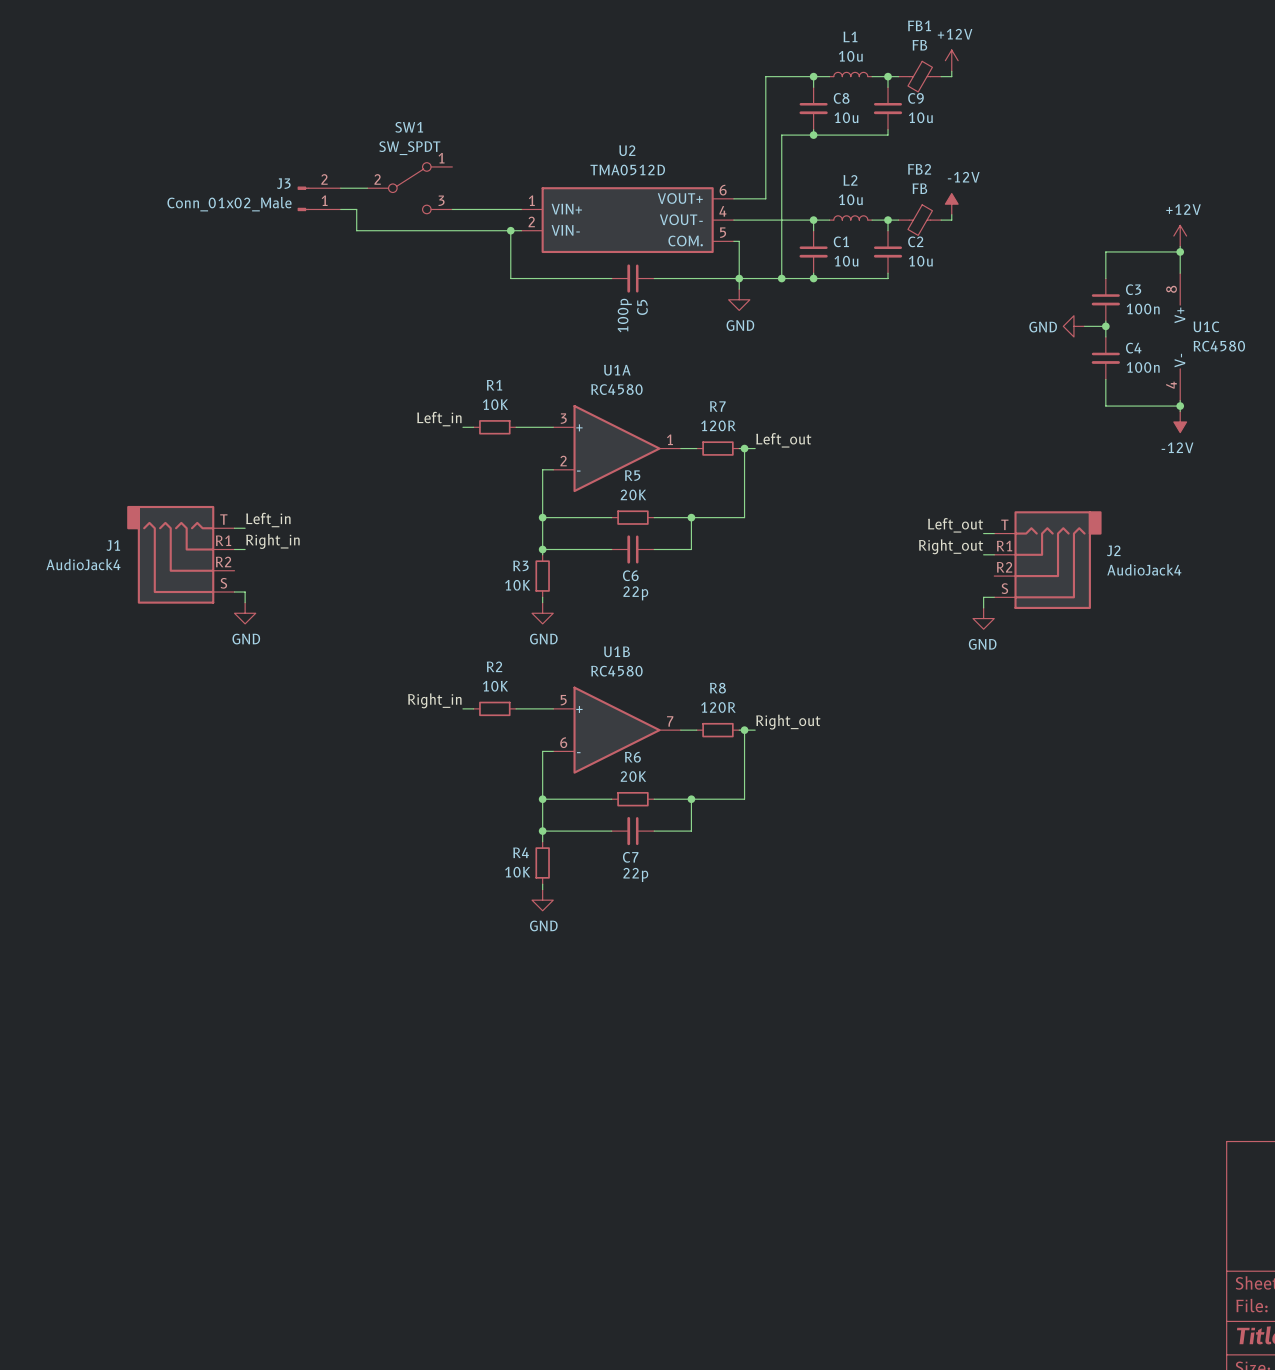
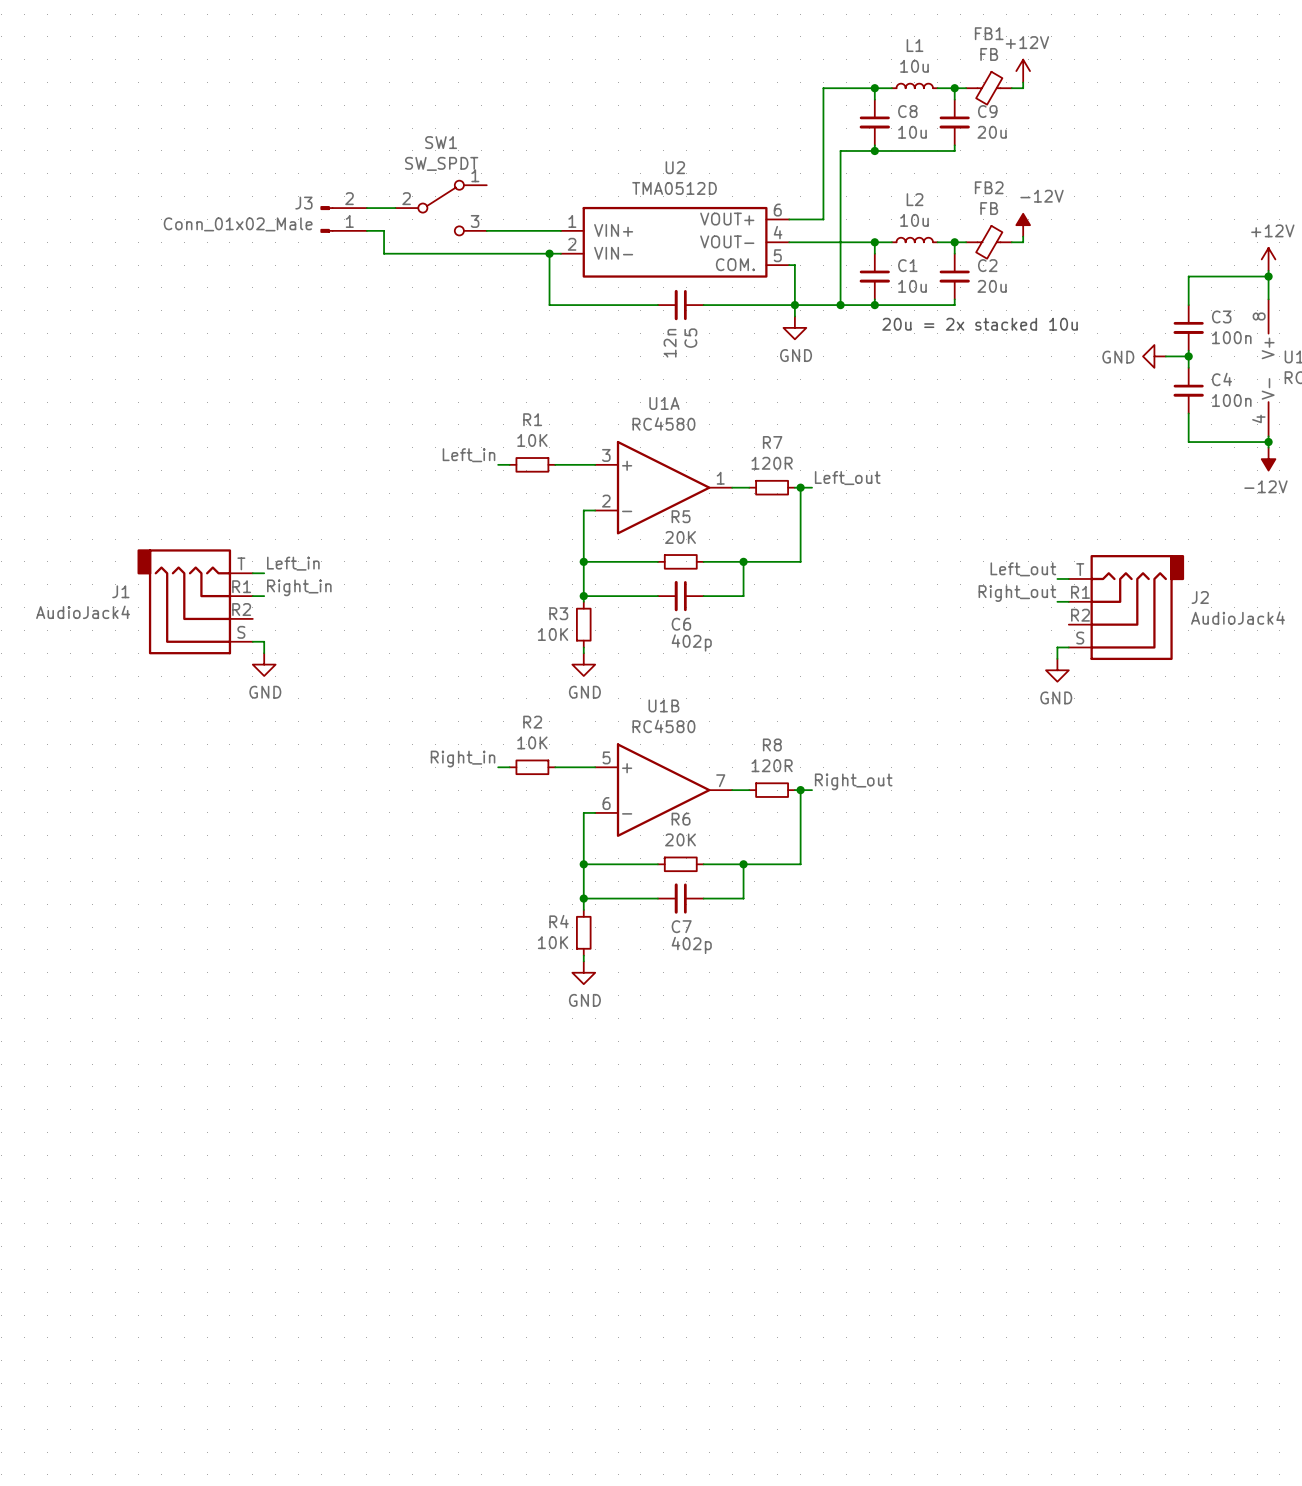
C9 value: 10u (920, 117) -> 20u (992, 132)
C2 value: 10u (920, 261) -> 20u (992, 286)
text: none -> 20u = 2x stacked 10u (980, 324)
C5 value: 100p (624, 315) -> 12n (670, 343)
C6 value: 22p (635, 593) -> 402p (691, 642)
C7 value: 22p (635, 874) -> 402p (691, 945)

